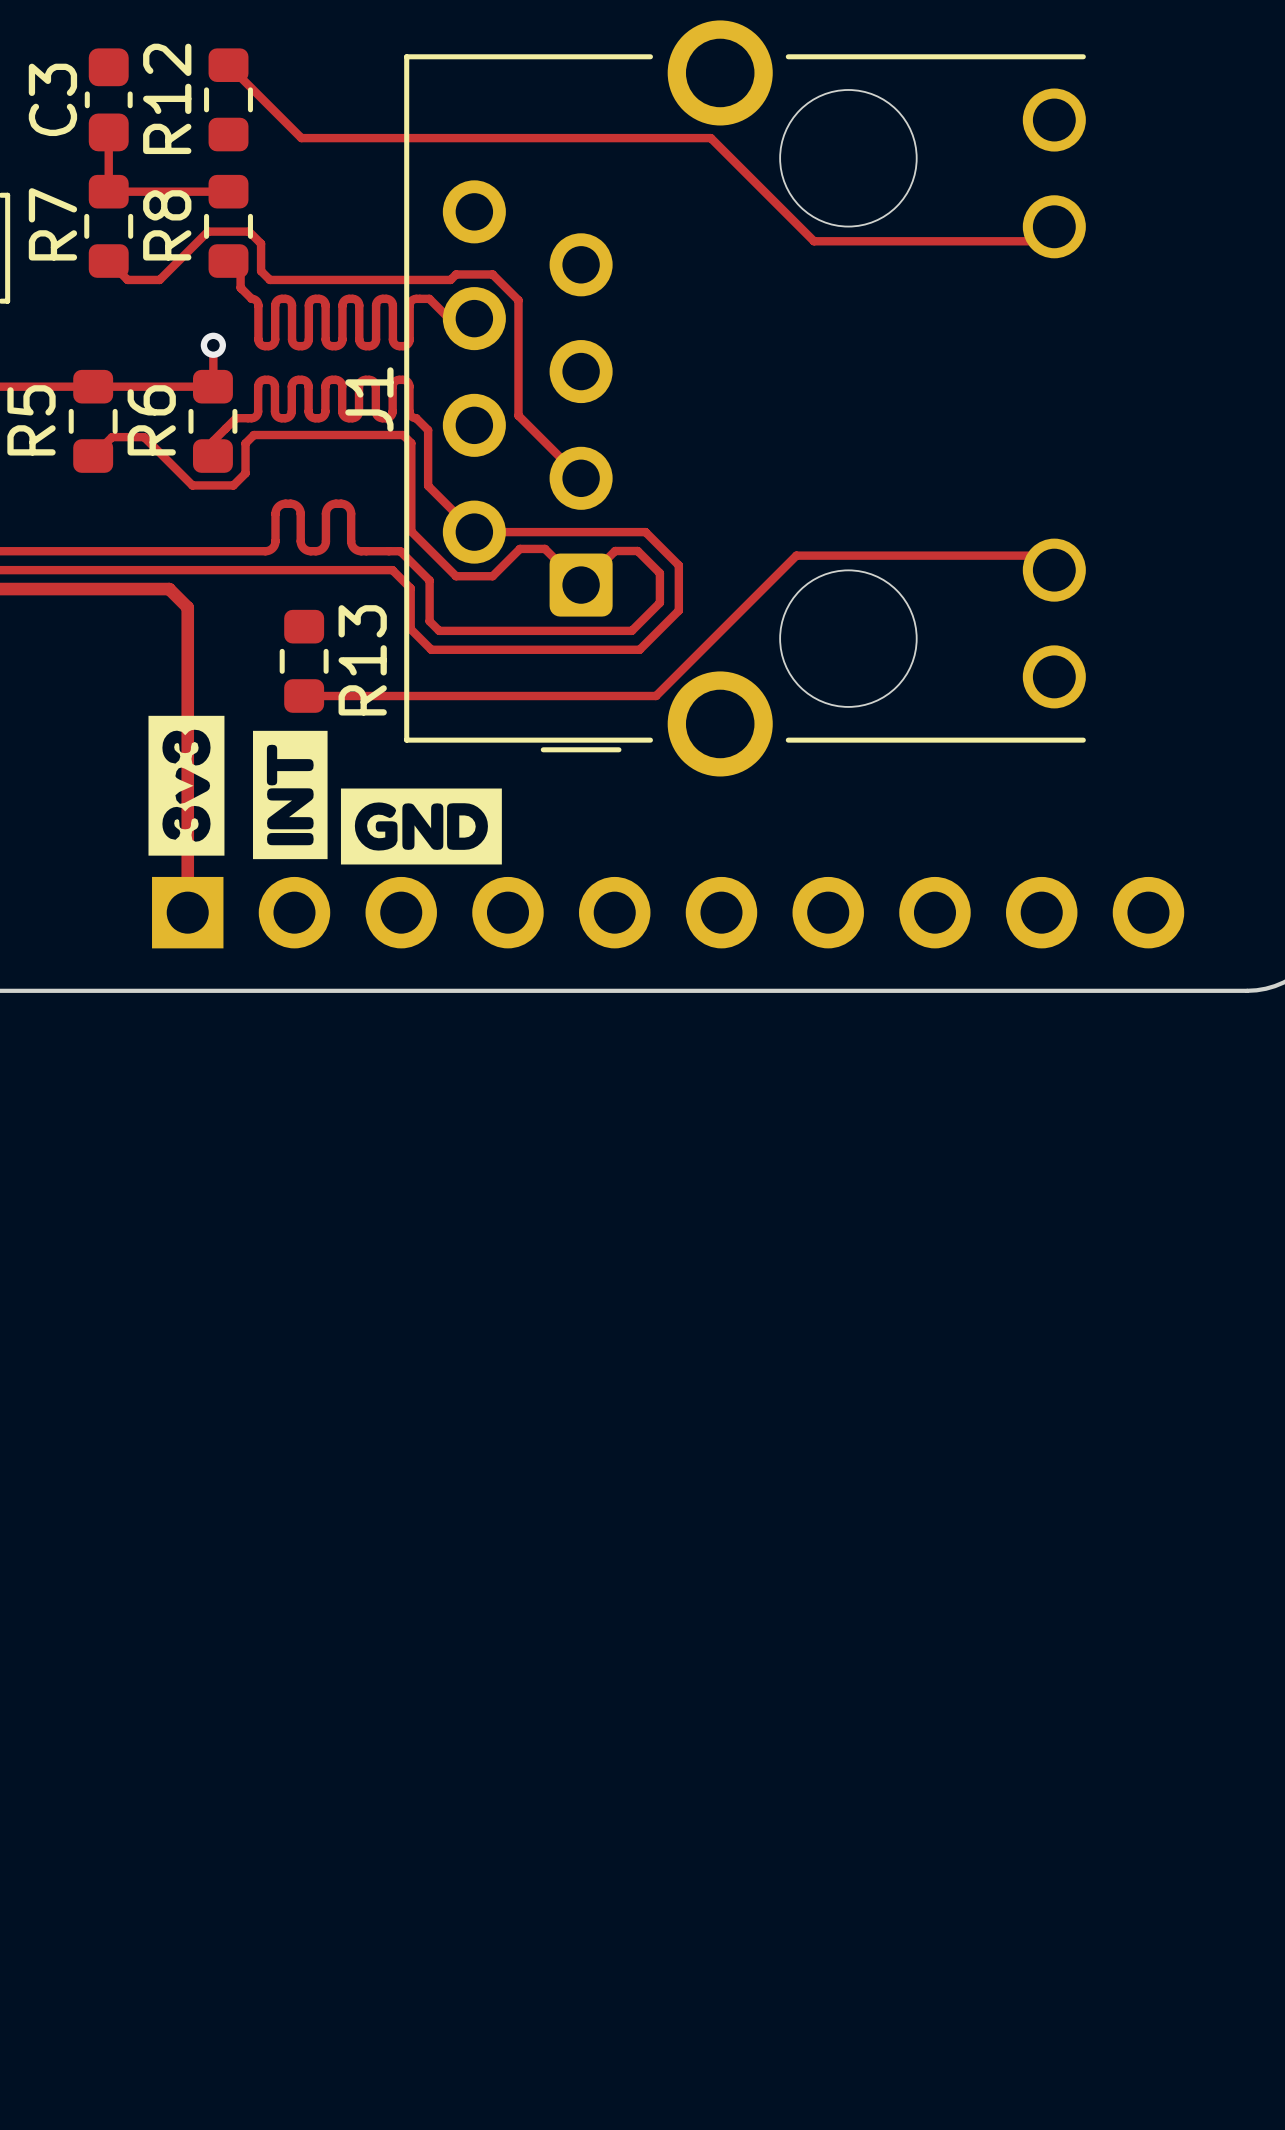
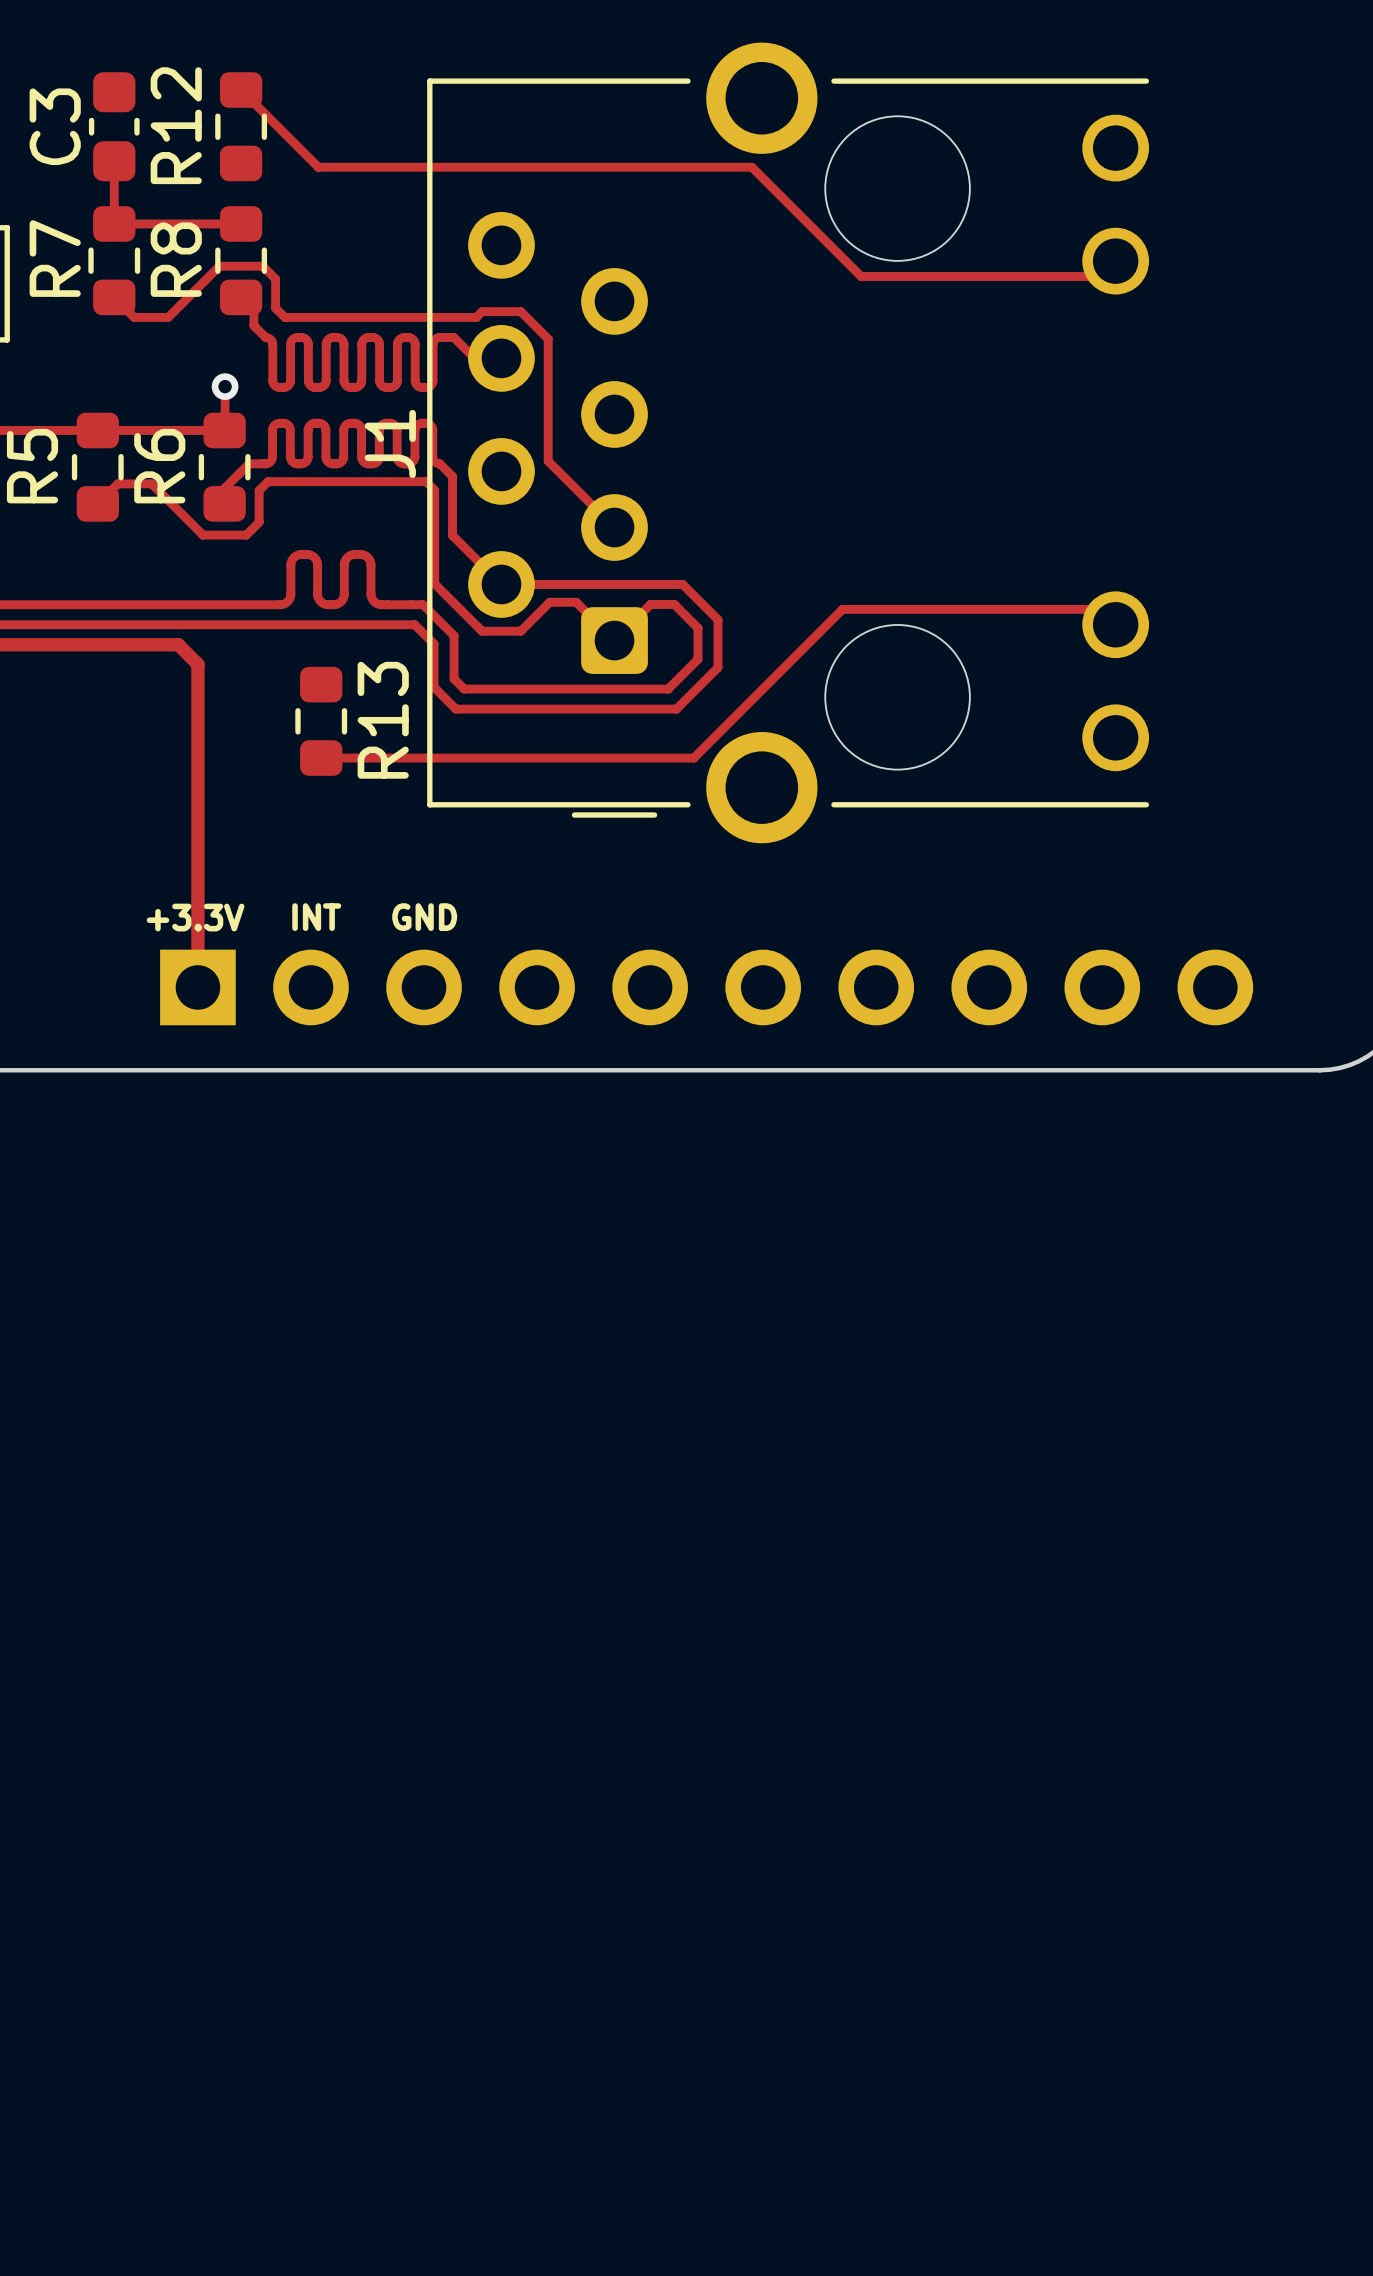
drawing: [148, 715, 502, 865] -> none
text: none -> +3.3V (195, 917)
text: none -> INT (316, 917)
text: none -> GND (424, 917)

